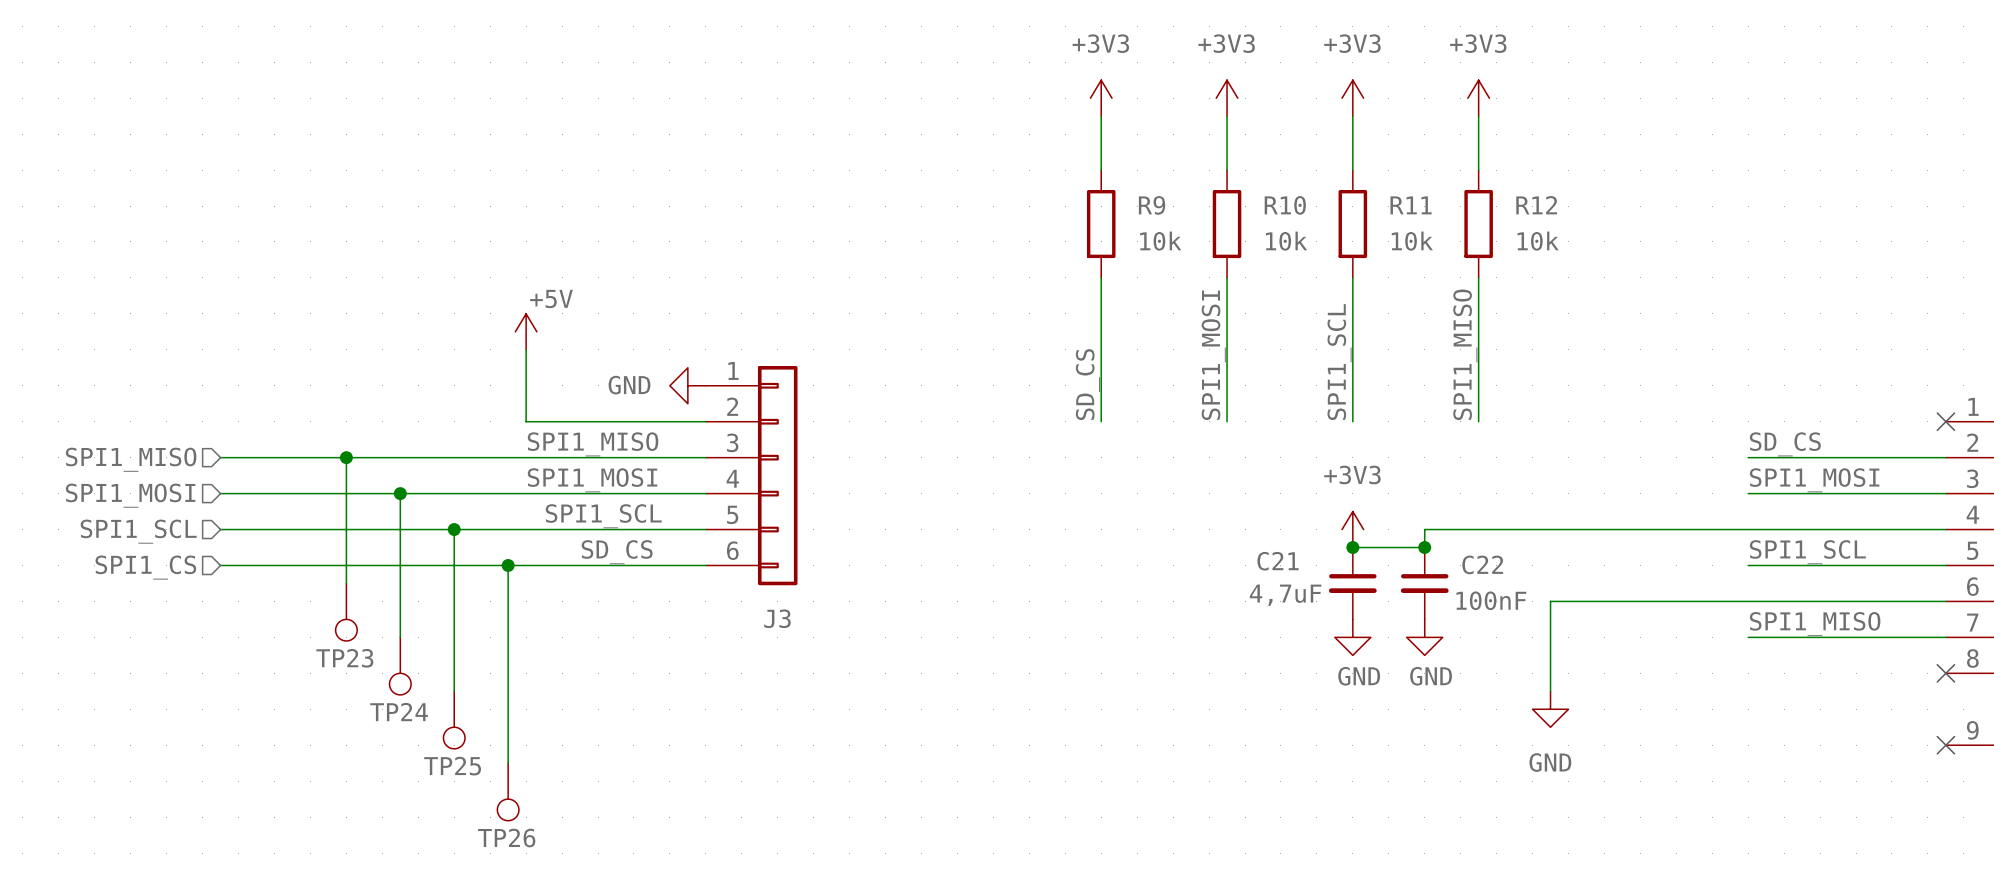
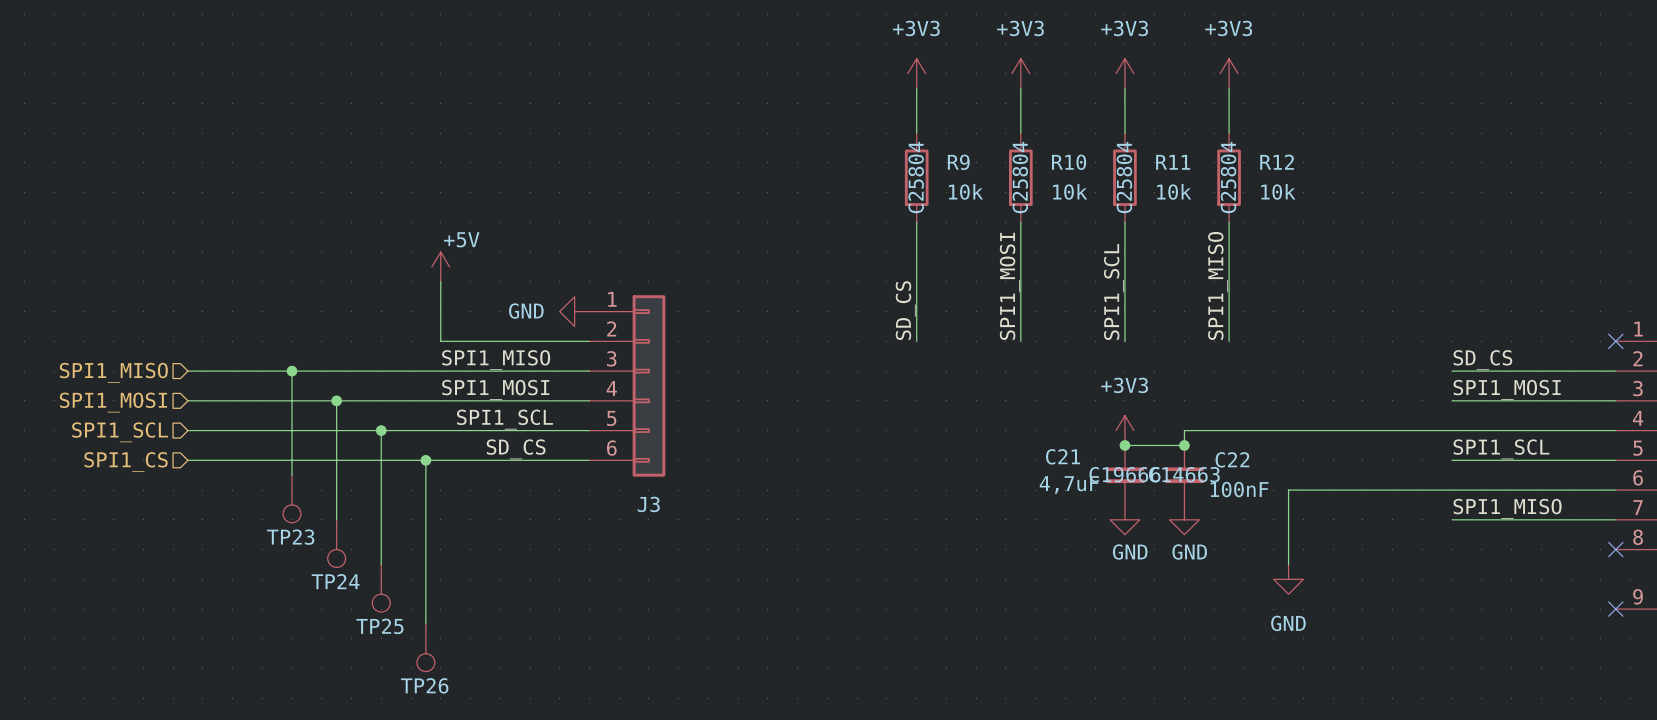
R9 text: none -> C25804 (916, 177)
R10 text: none -> C25804 (1020, 177)
R11 text: none -> C25804 (1124, 177)
R12 text: none -> C25804 (1228, 177)
C21 text: none -> C19666 (1124, 474)
C22 text: none -> C14663 (1184, 474)

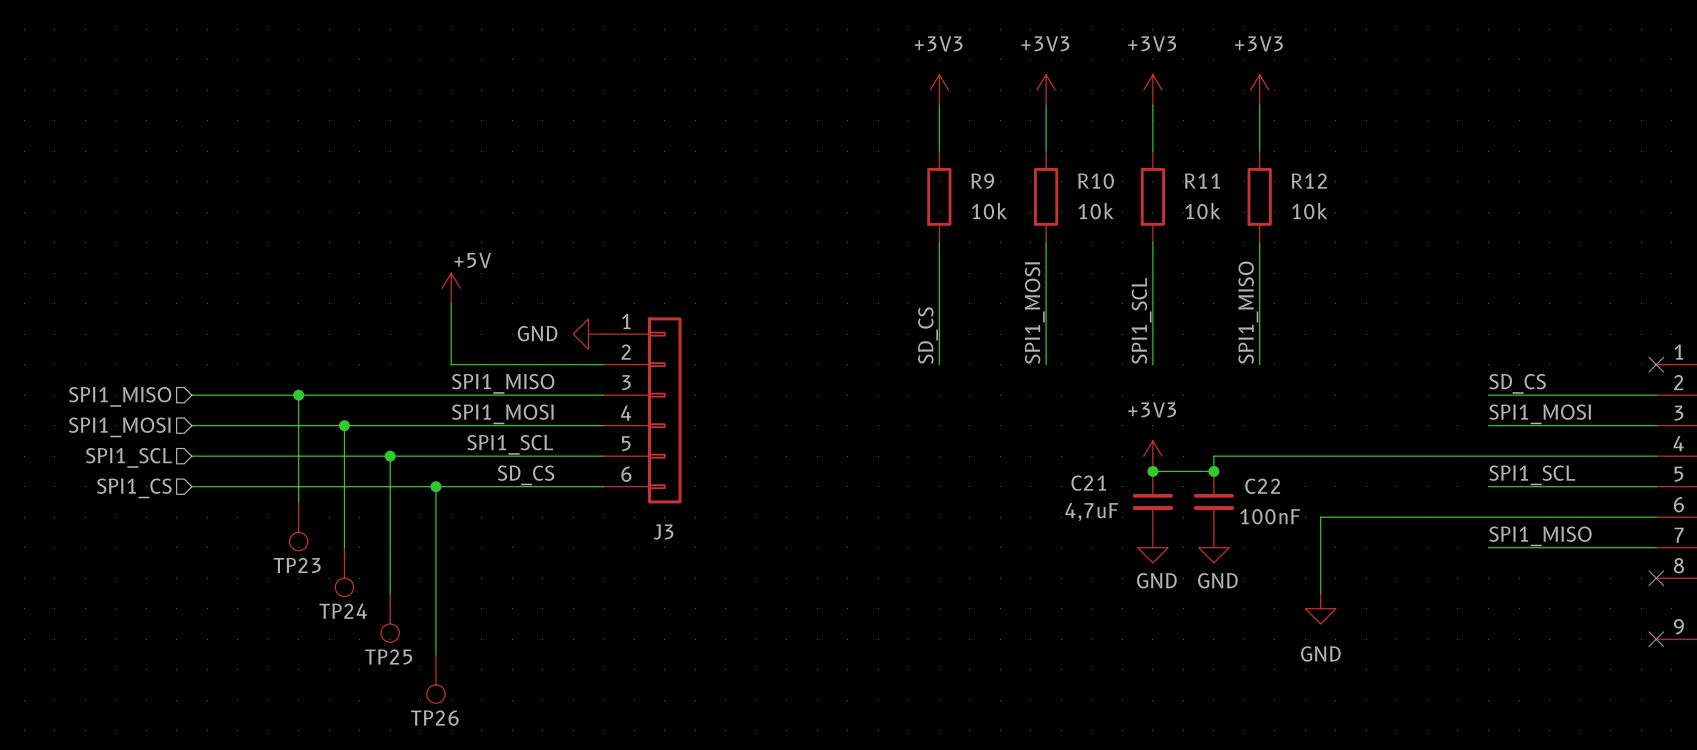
R9 text: C25804 (916, 177) -> none
R10 text: C25804 (1020, 177) -> none
R11 text: C25804 (1124, 177) -> none
R12 text: C25804 (1228, 177) -> none
C21 text: C19666 (1124, 474) -> none
C22 text: C14663 (1184, 474) -> none

